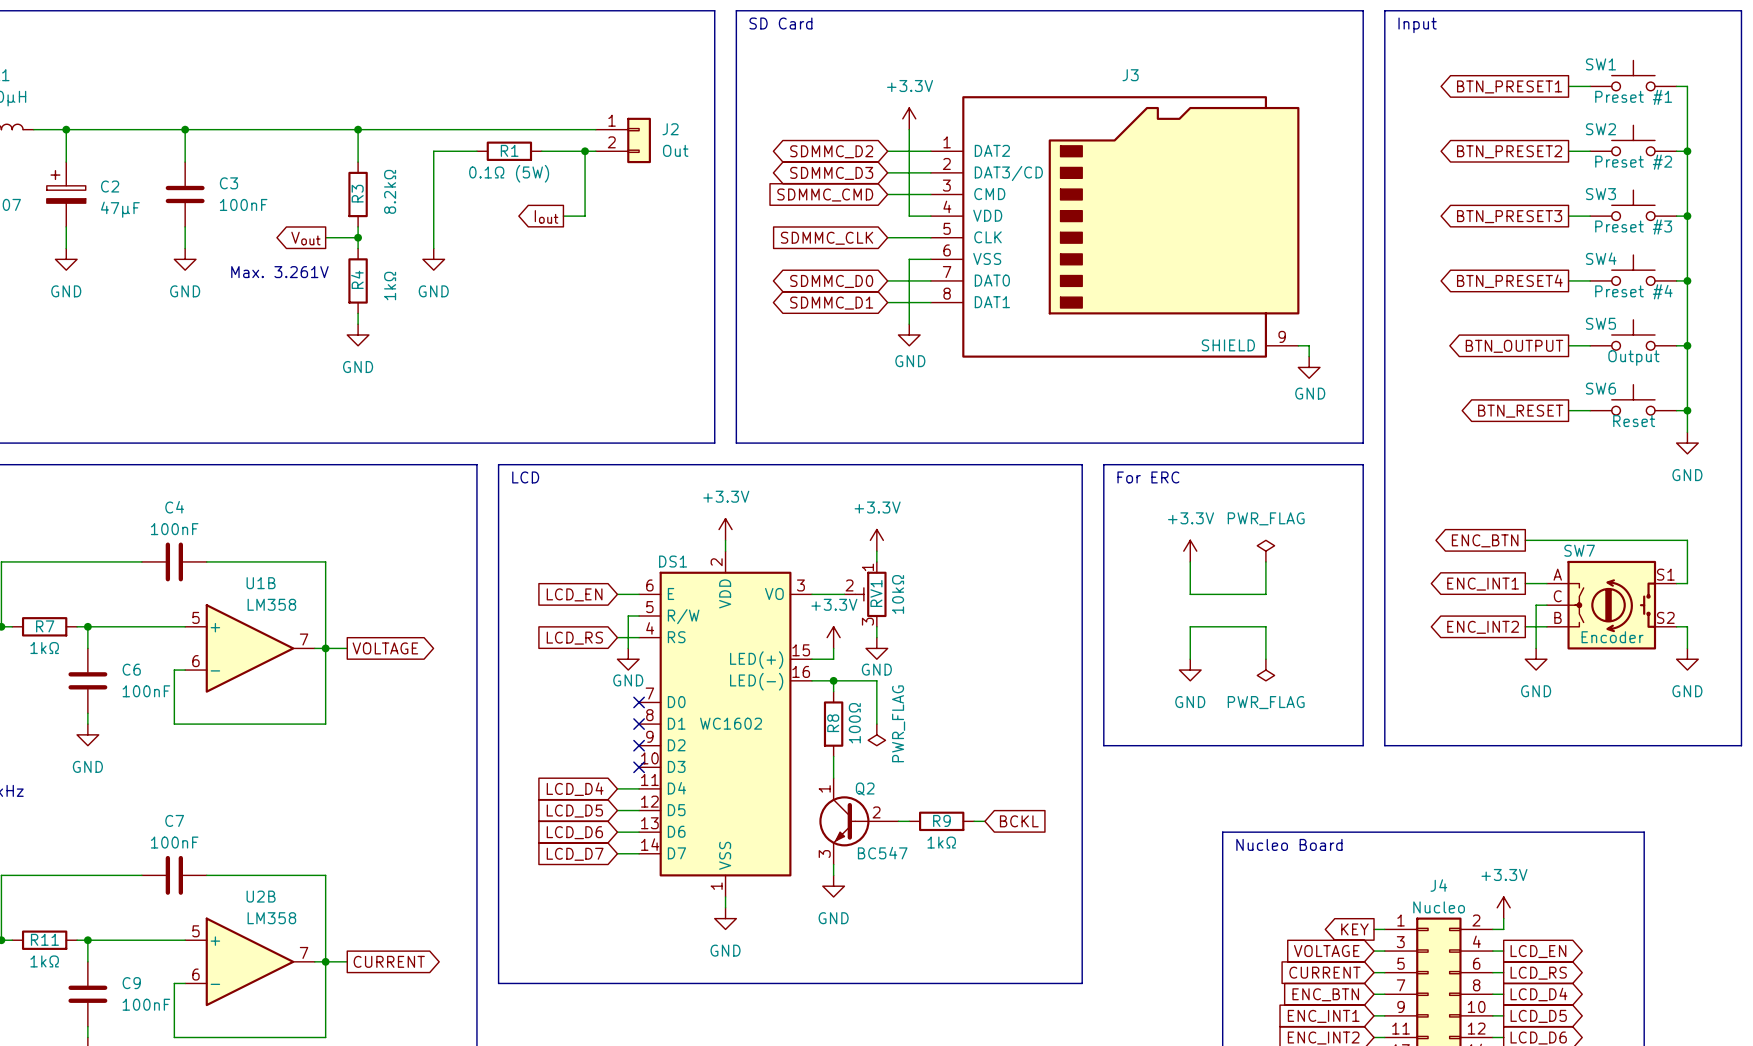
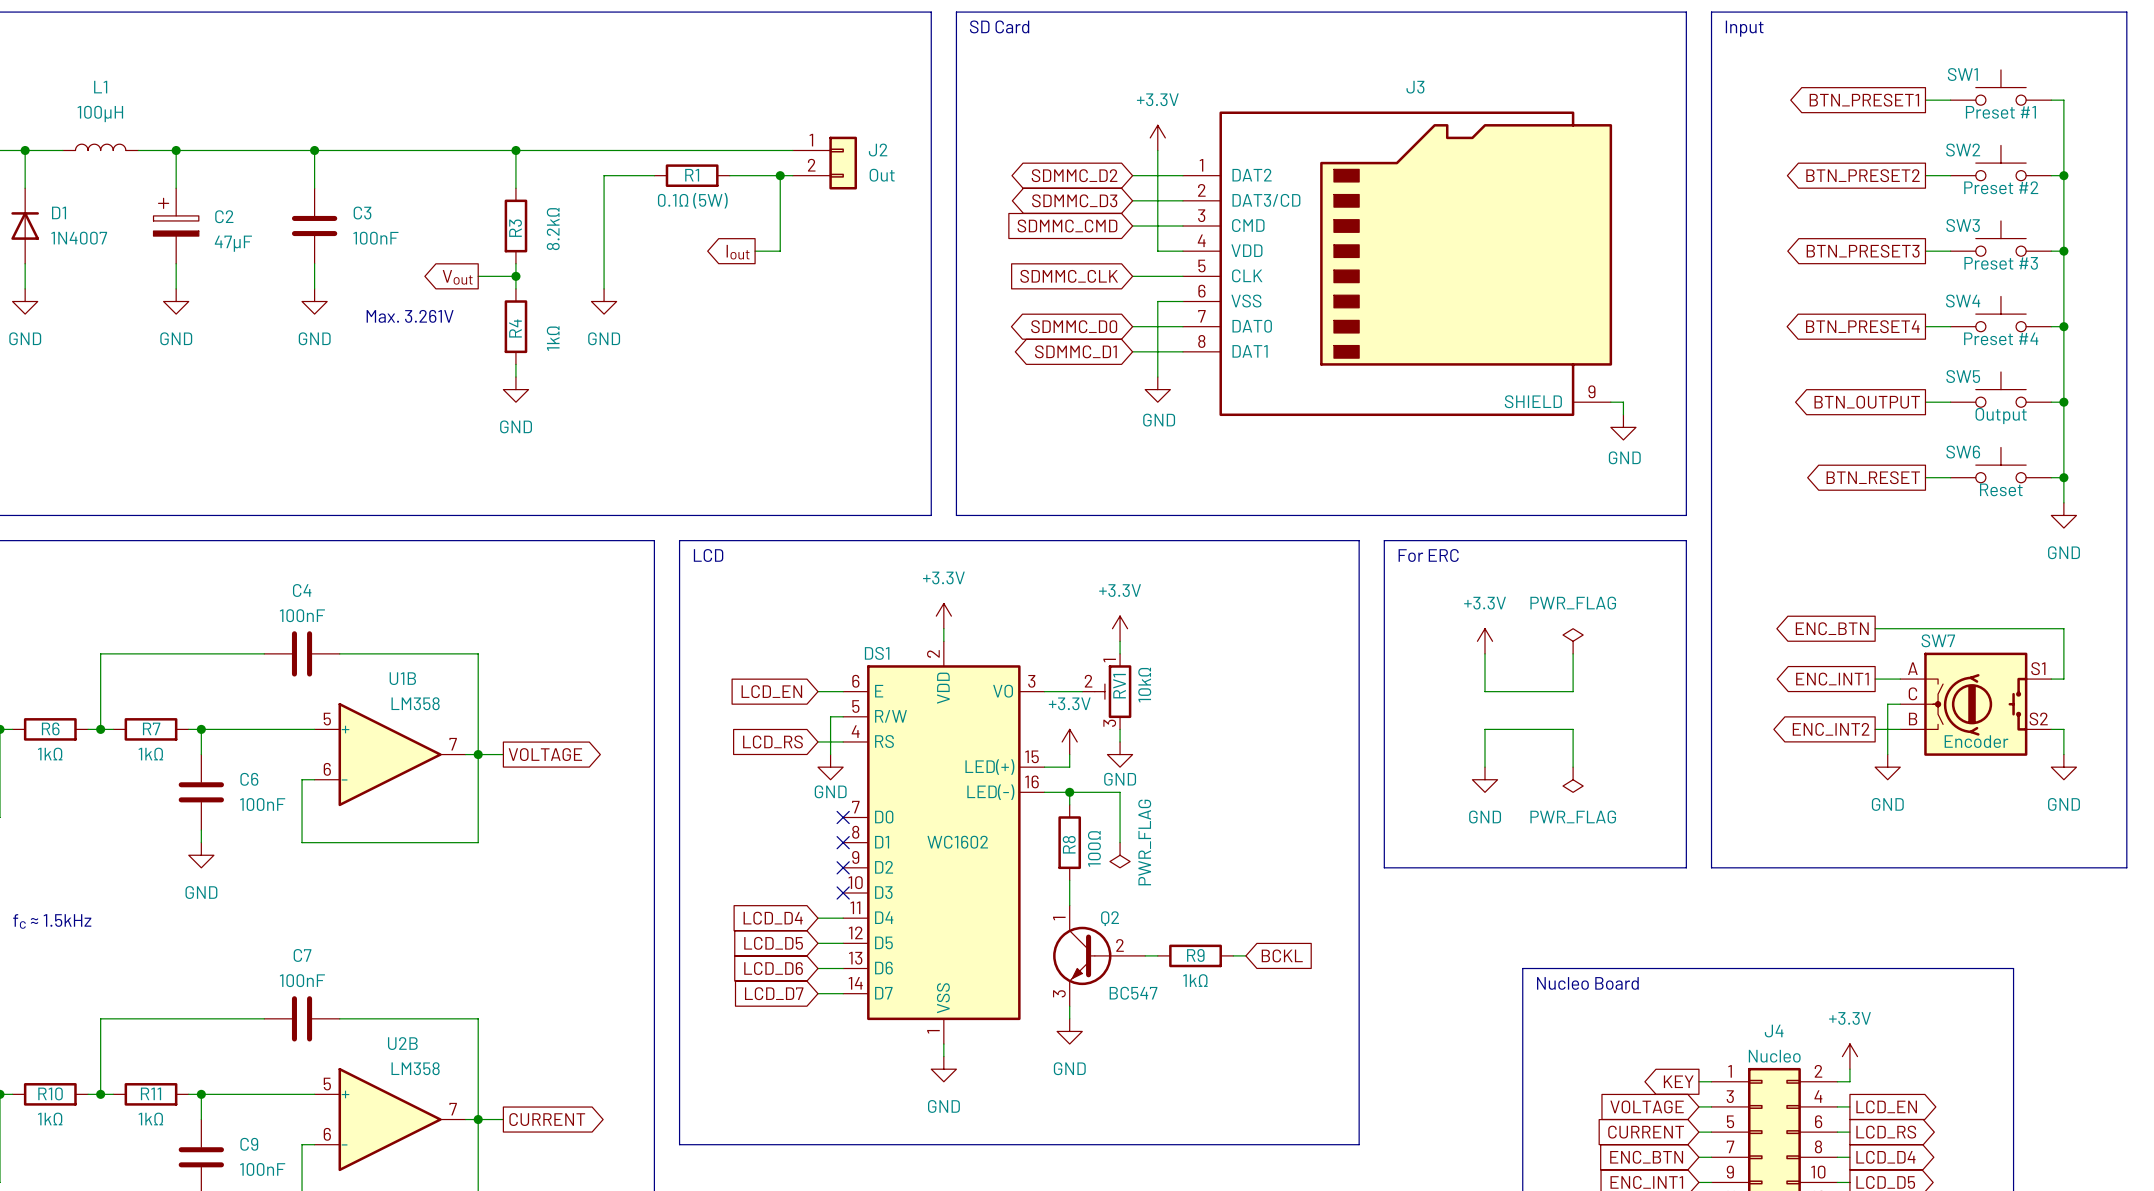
SW7 symbol: [1546, 560, 1677, 650] -> [1900, 652, 2052, 756]

